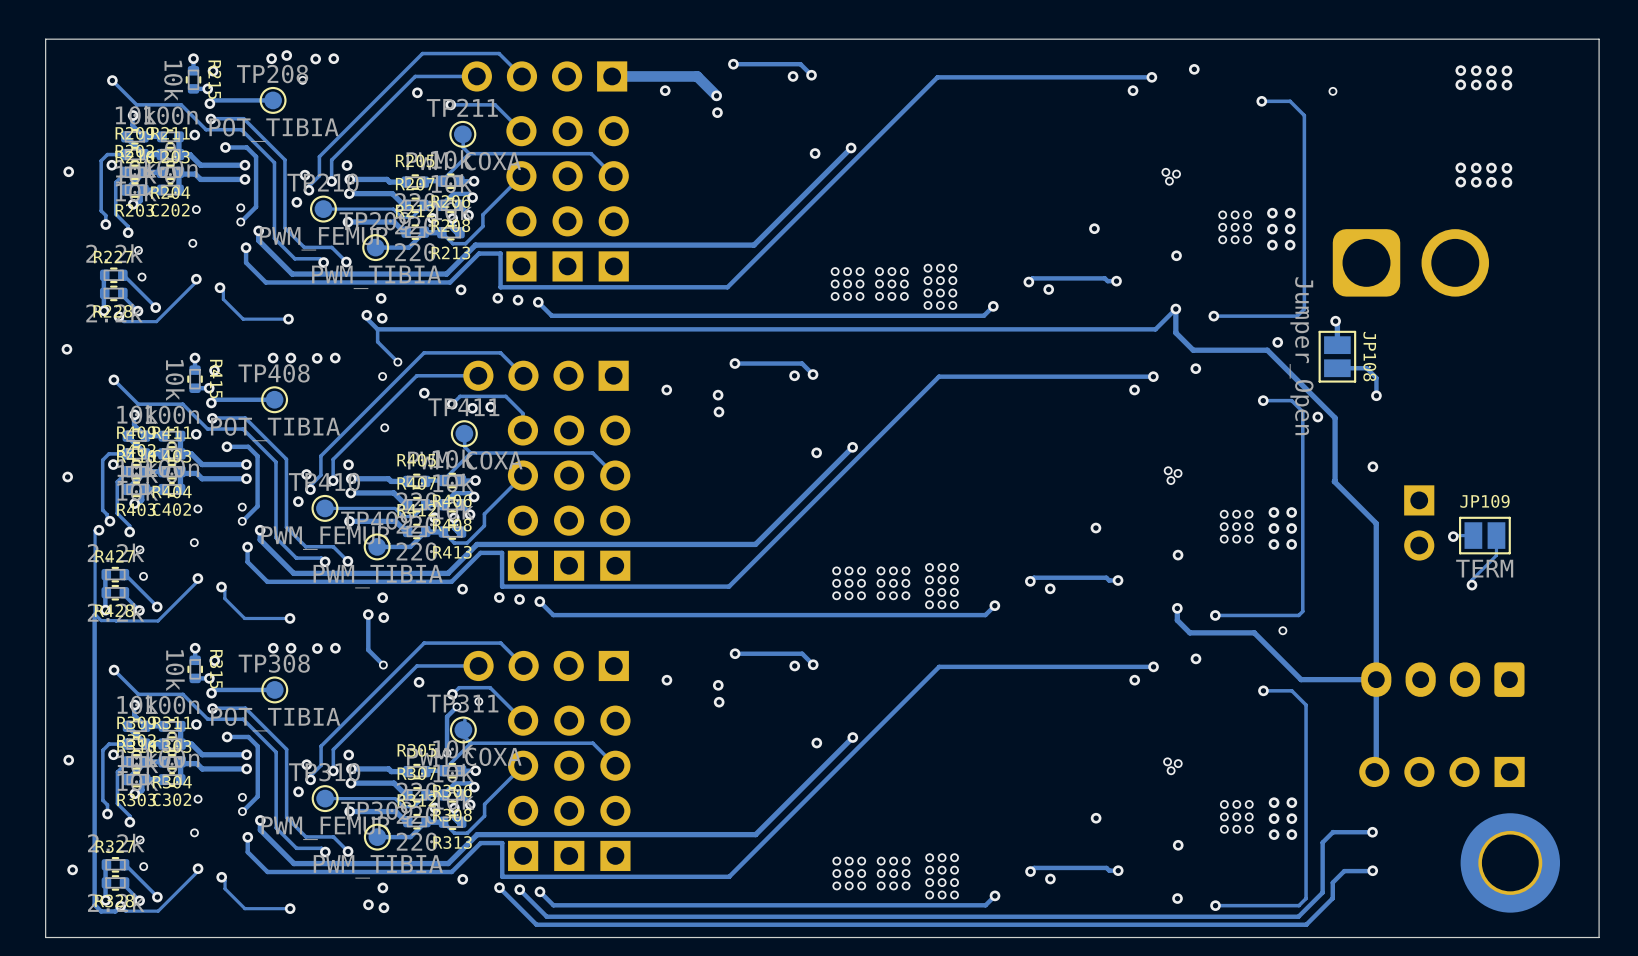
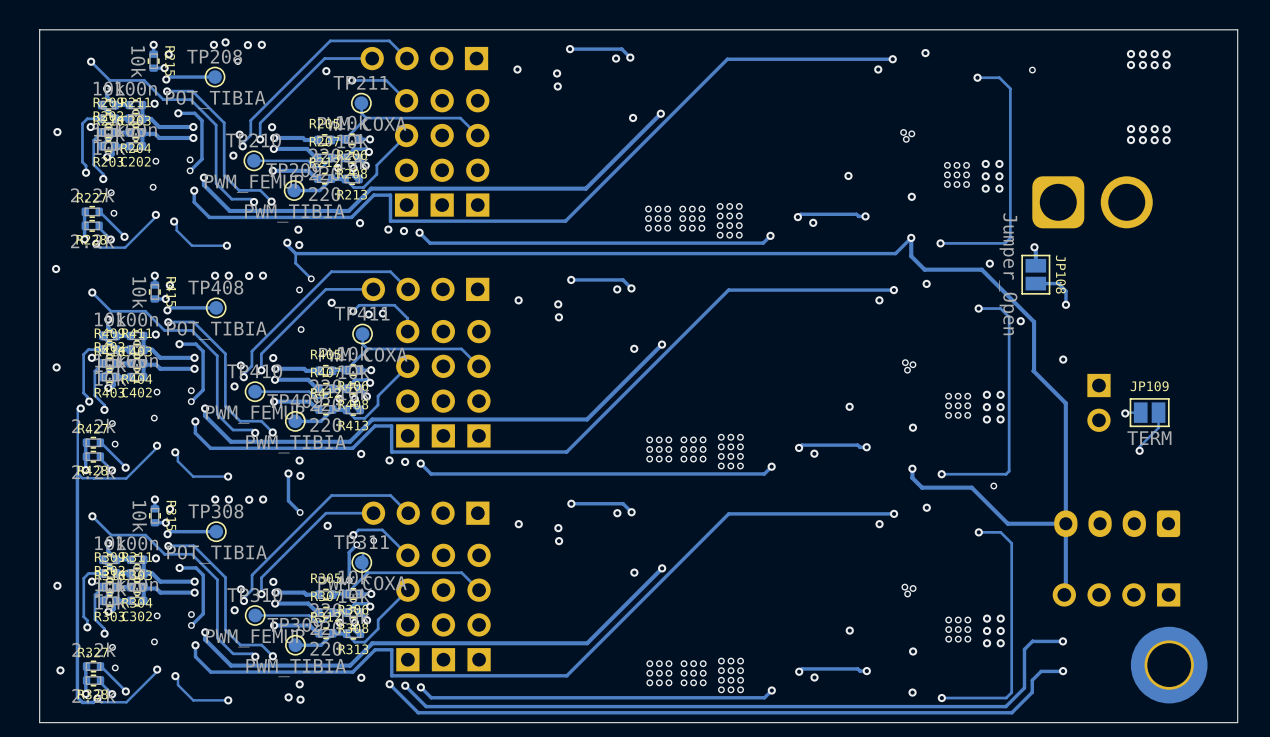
track: (612, 76) (697, 76) (716, 95) -> none

